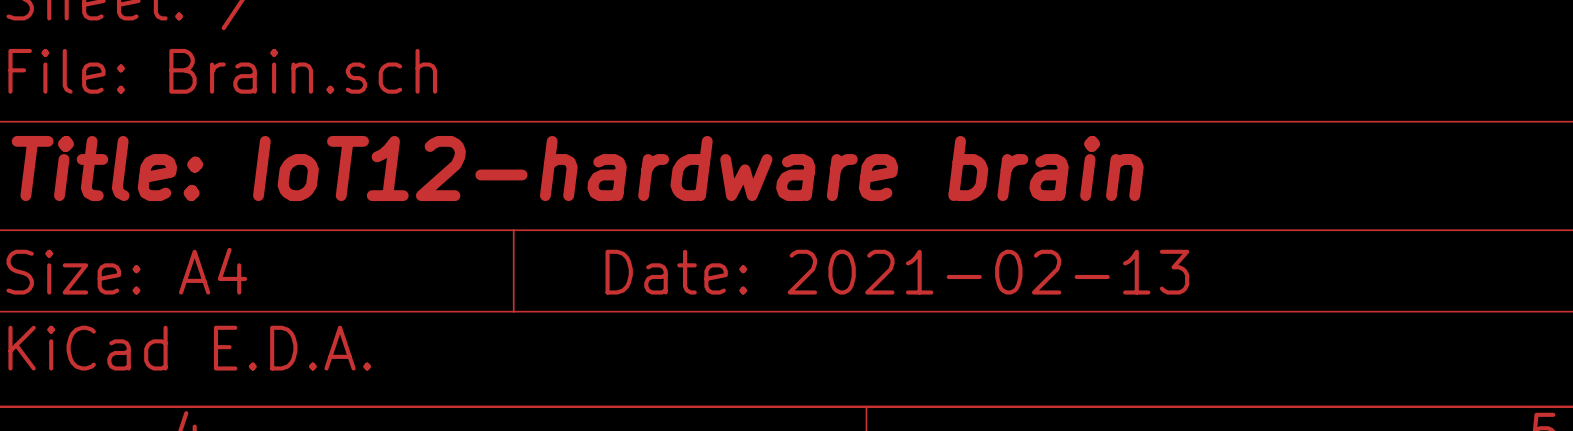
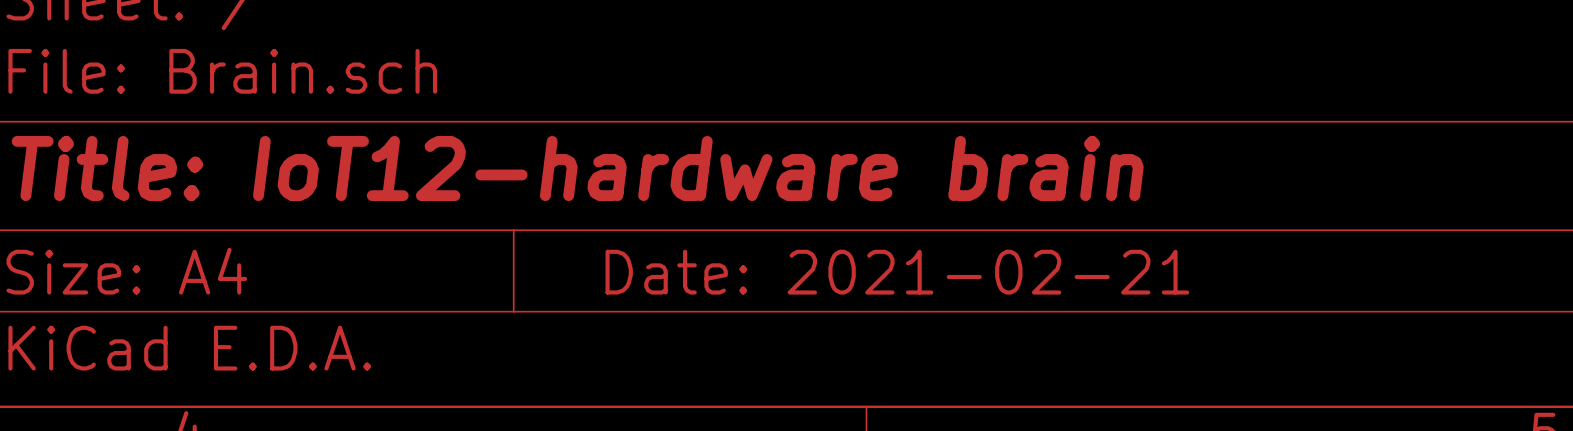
title block: Date: 2021-02-13 (897, 272) -> Date: 2021-02-21 (897, 272)

